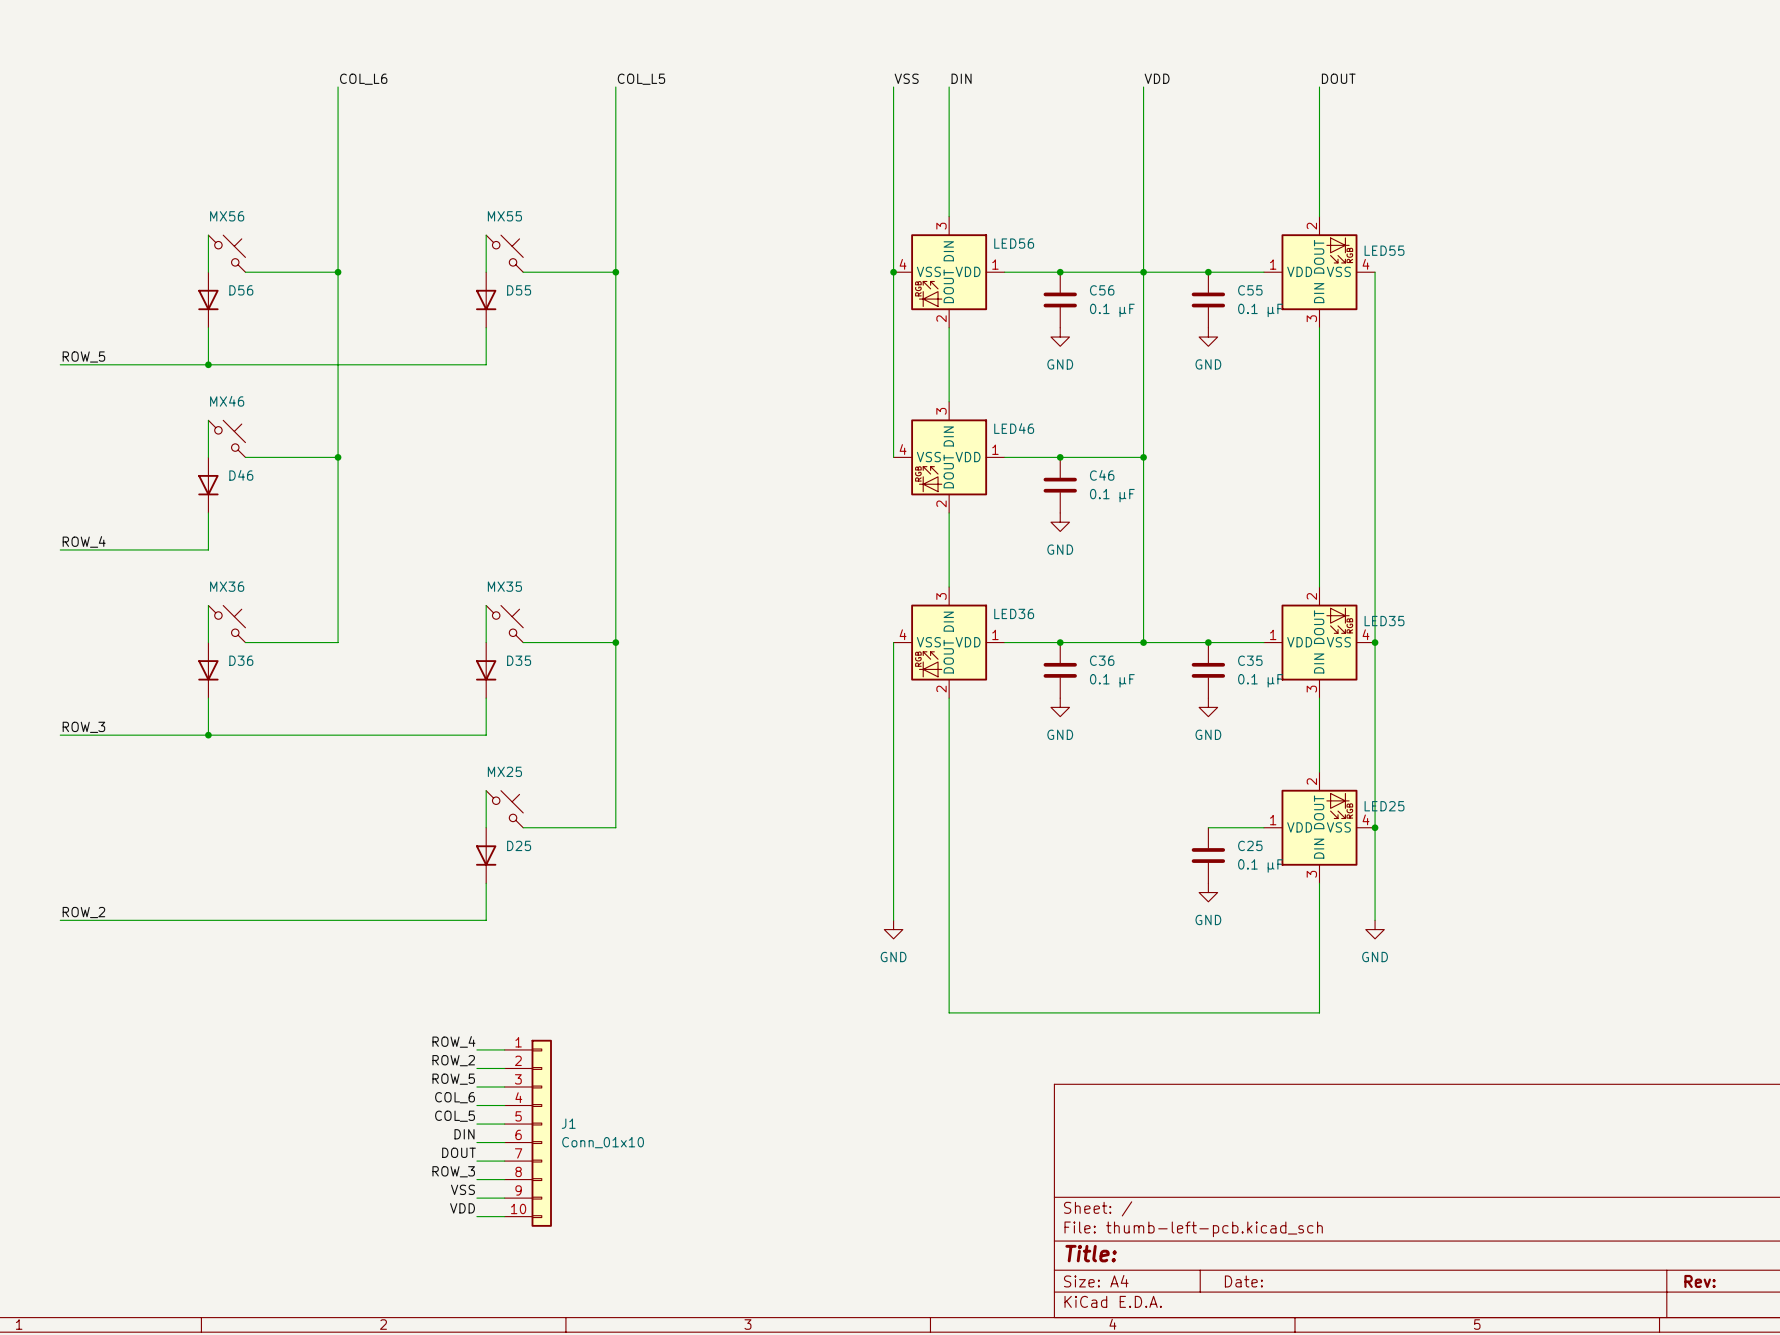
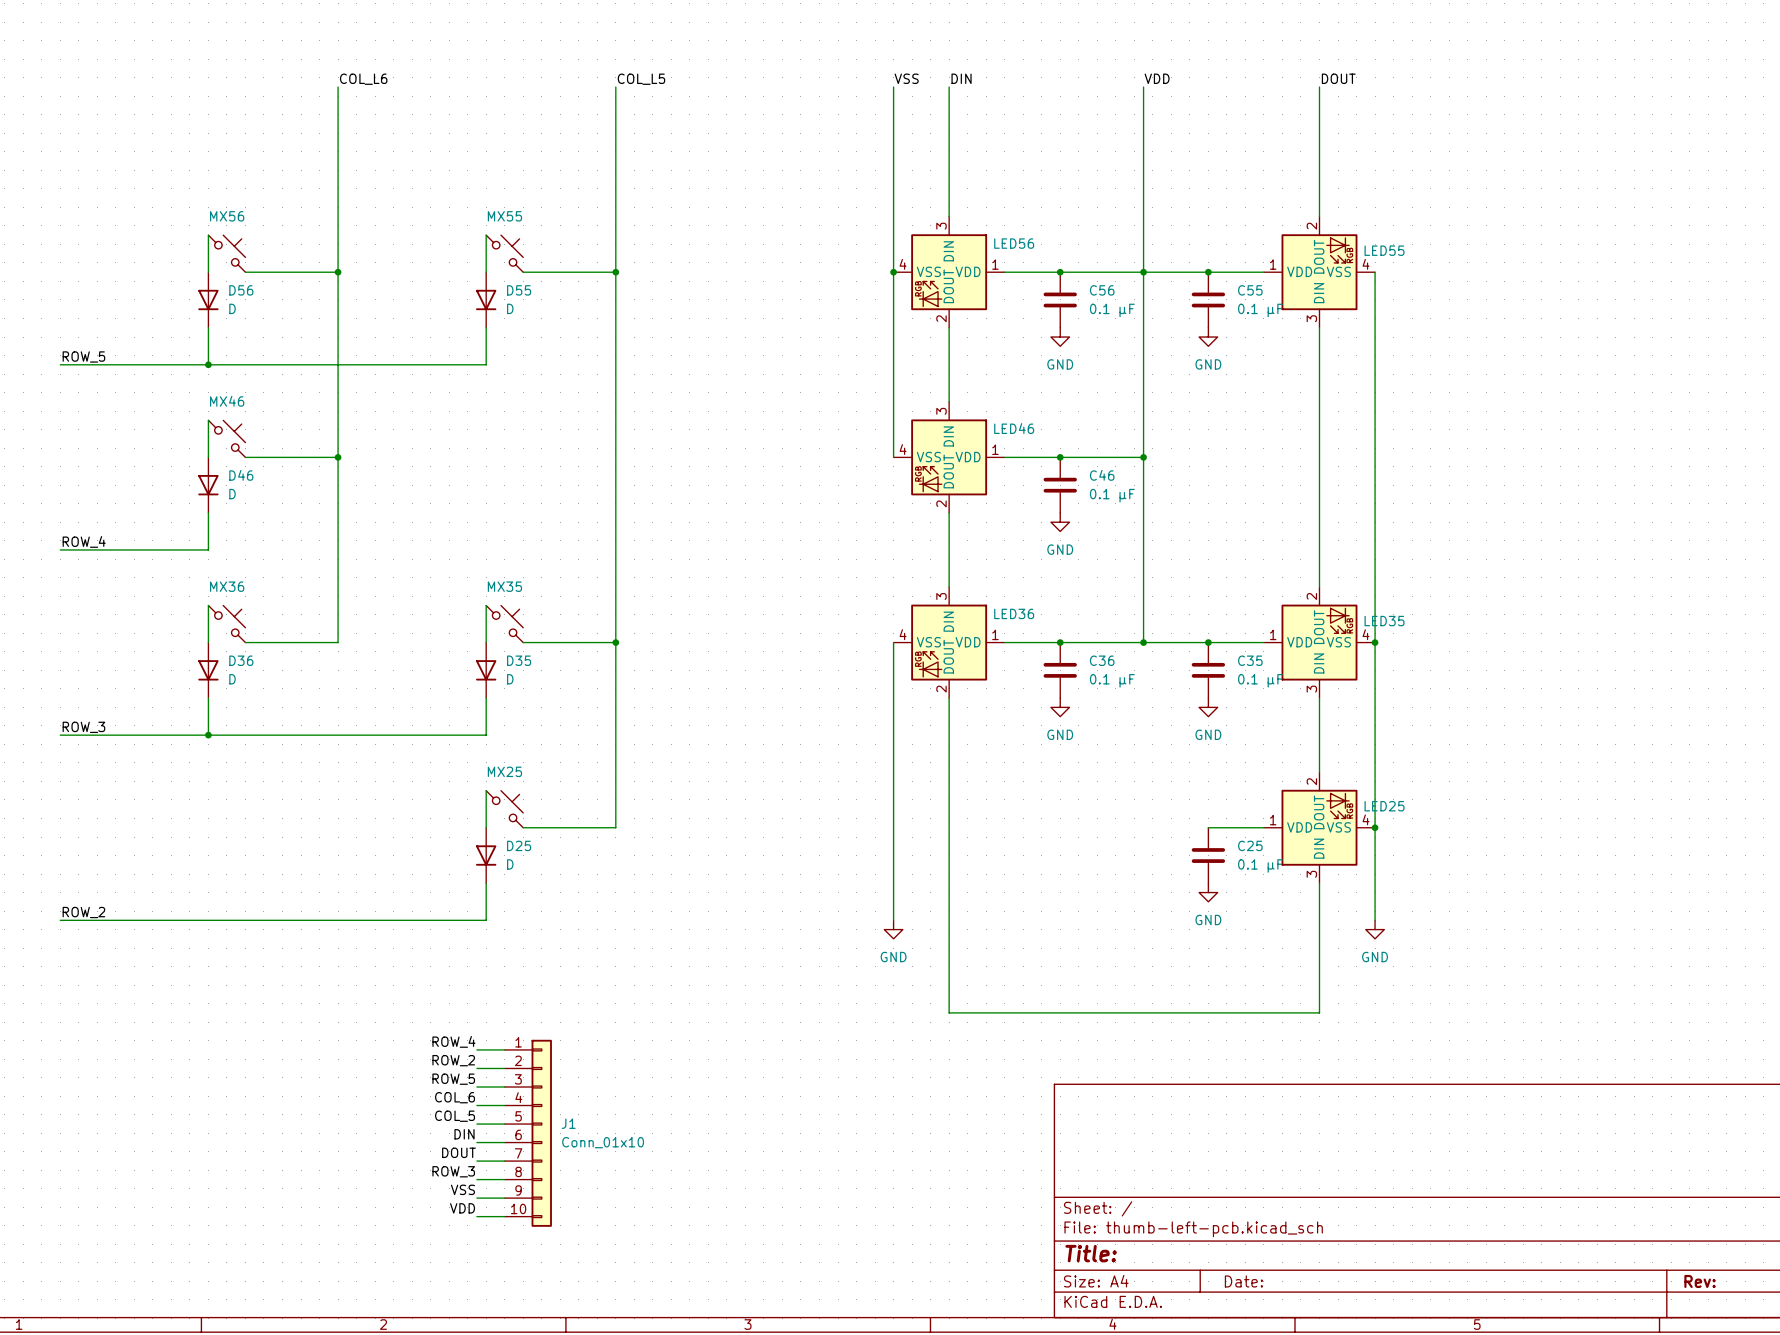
D56 value: none -> D (232, 308)
D55 value: none -> D (510, 308)
D46 value: none -> D (232, 494)
D36 value: none -> D (232, 679)
D35 value: none -> D (510, 679)
D25 value: none -> D (510, 864)

